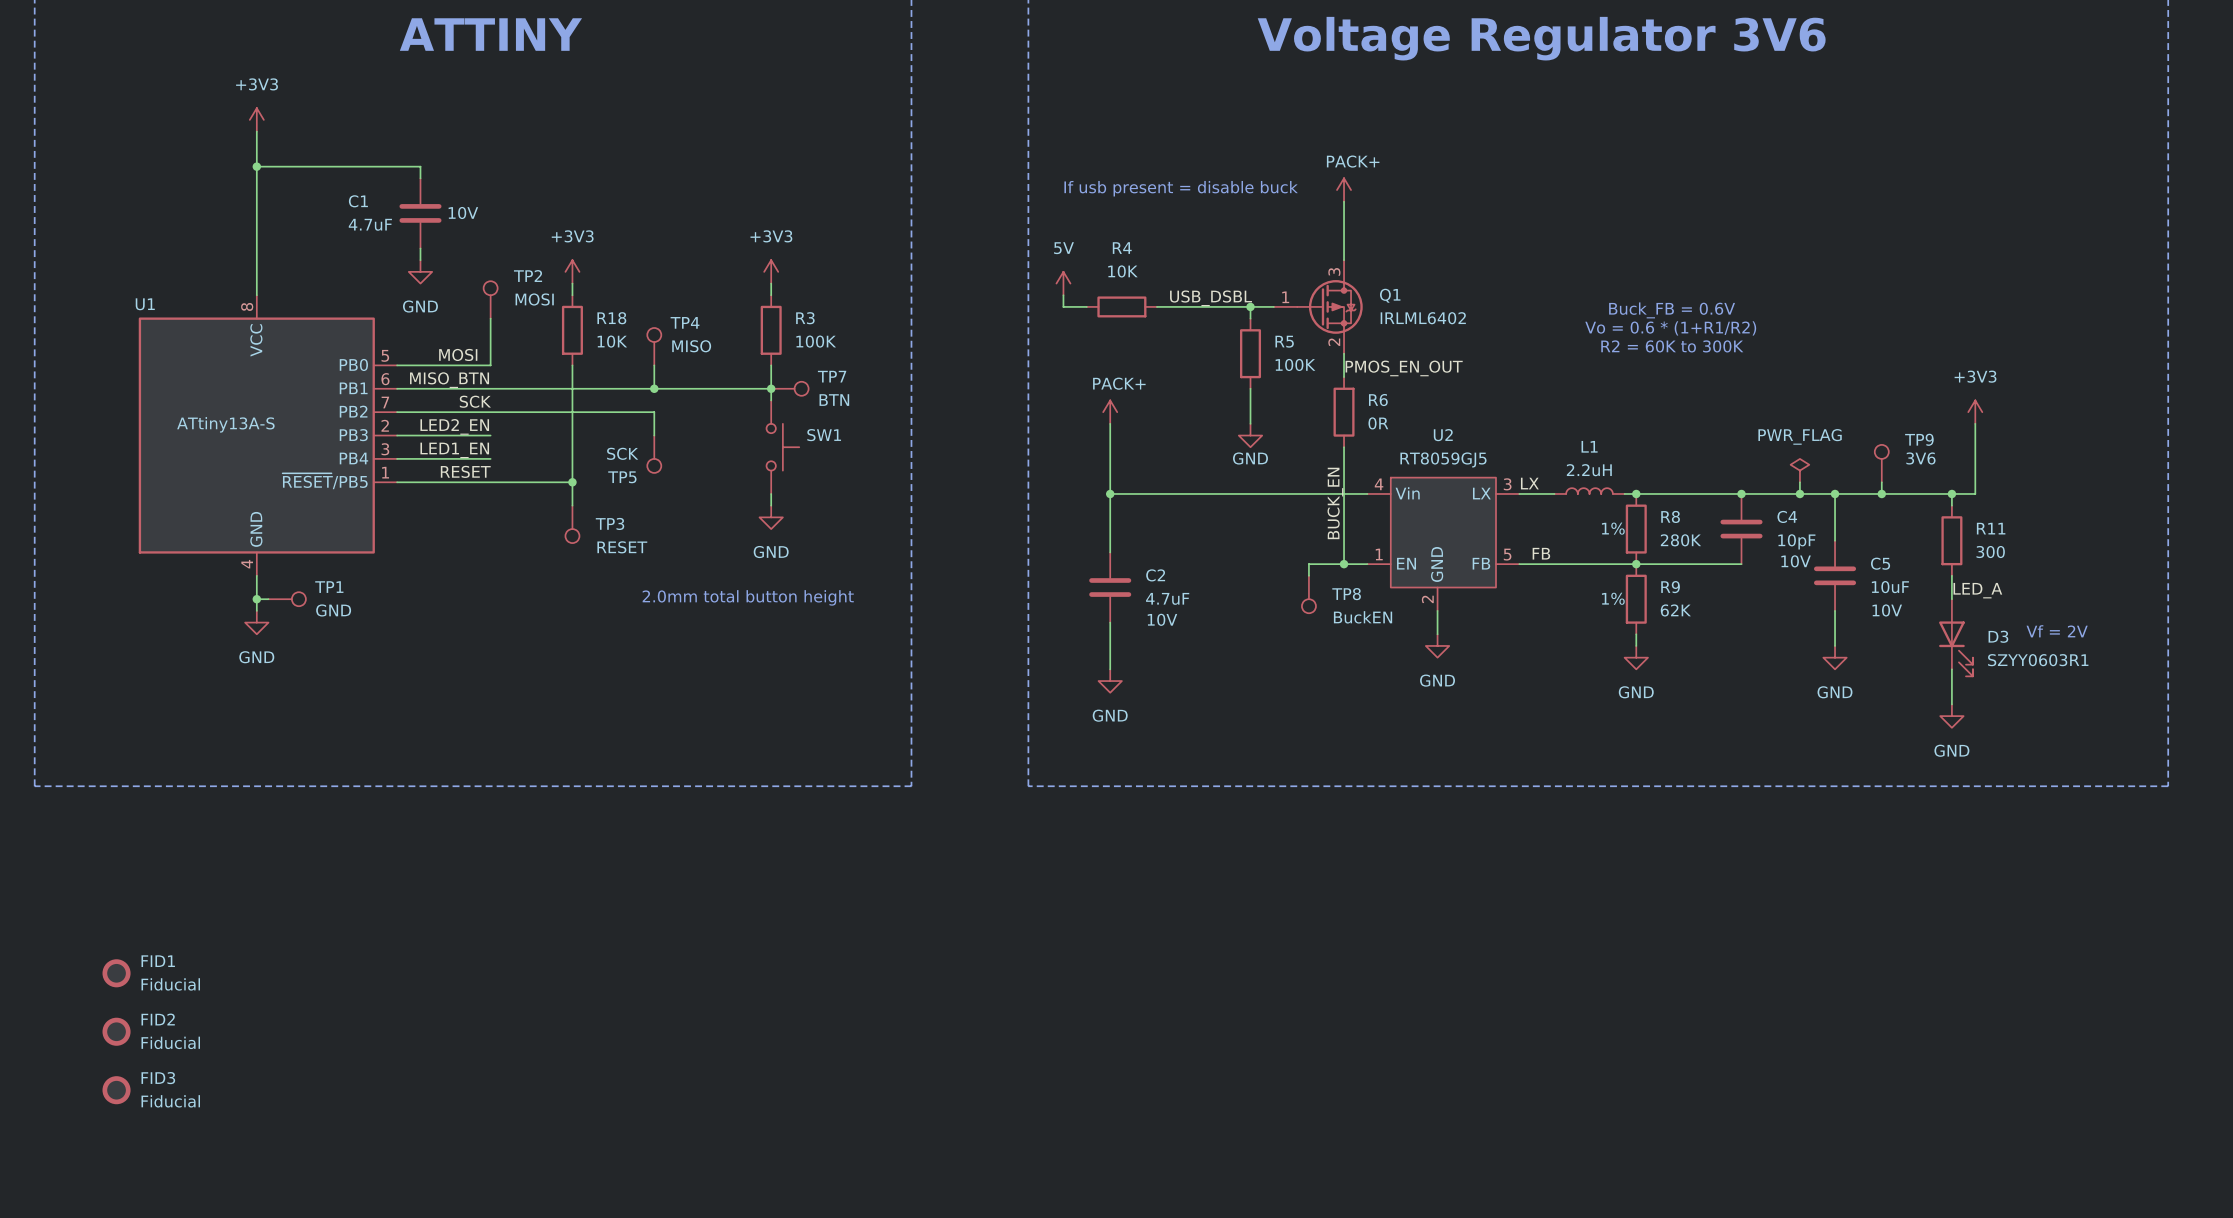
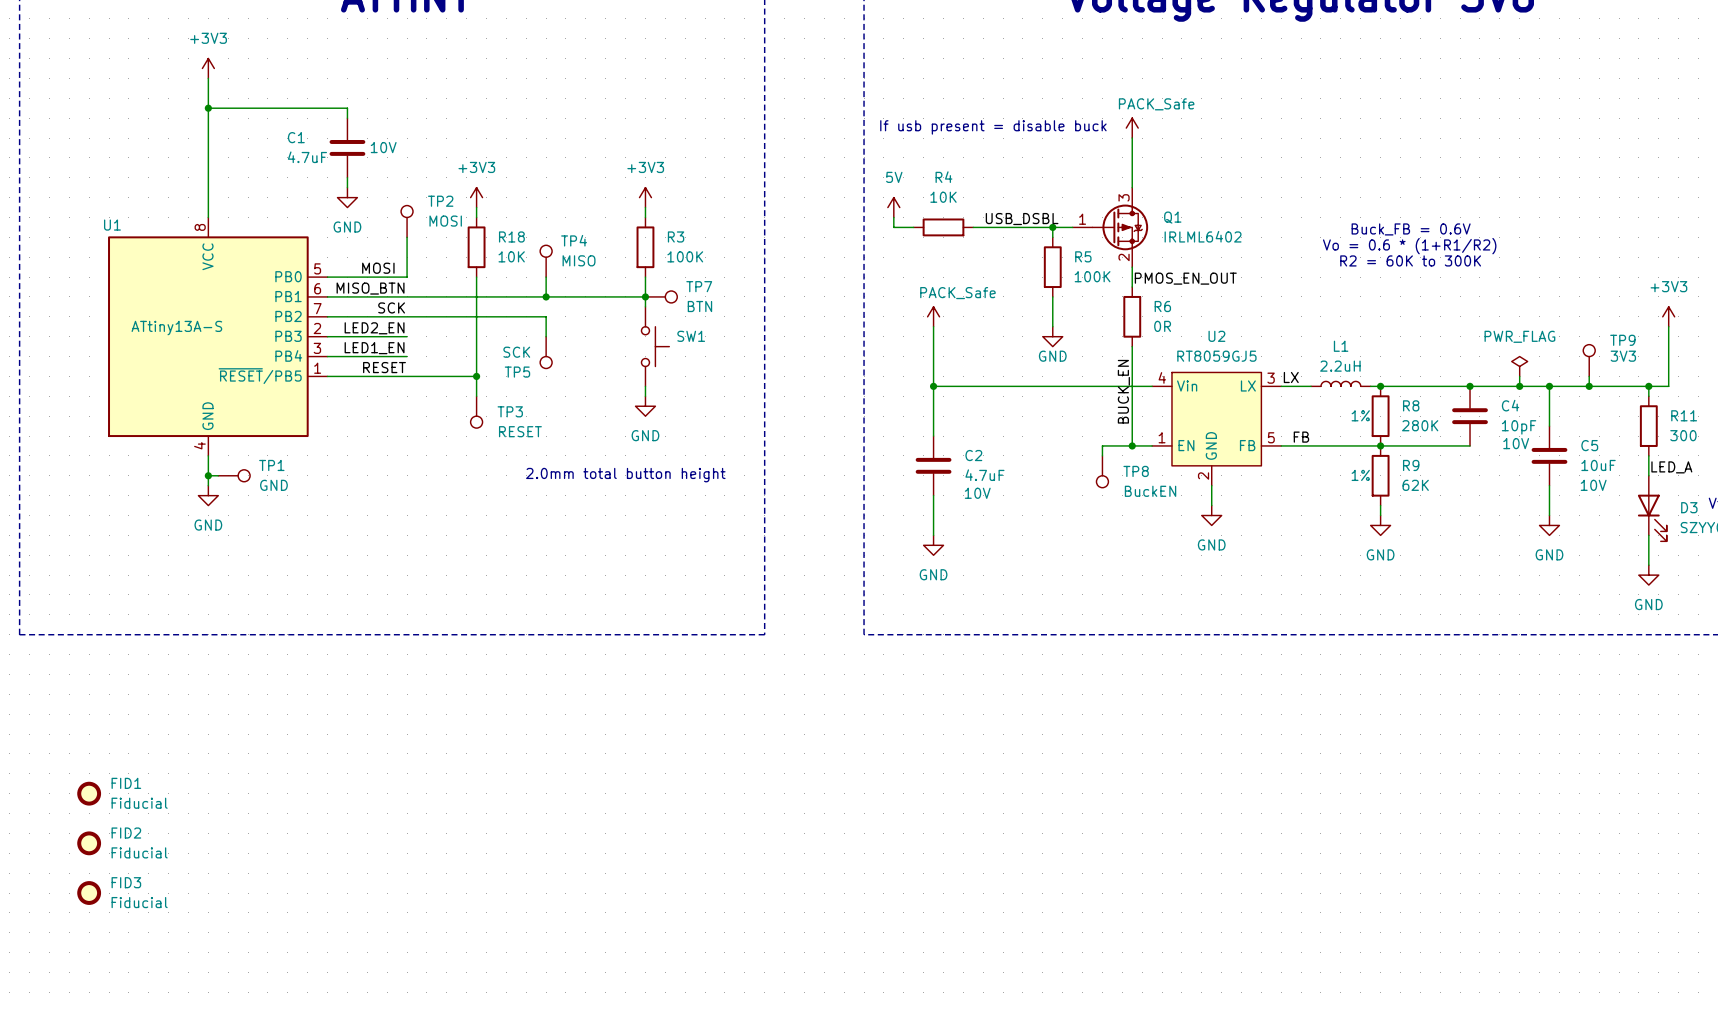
power symbol: PACK+ (1344, 190) -> PACK_Safe (1132, 128)
power symbol: PACK+ (1110, 412) -> PACK_Safe (933, 316)
TP9 value: 3V6 (1920, 458) -> 3V3 (1623, 356)

